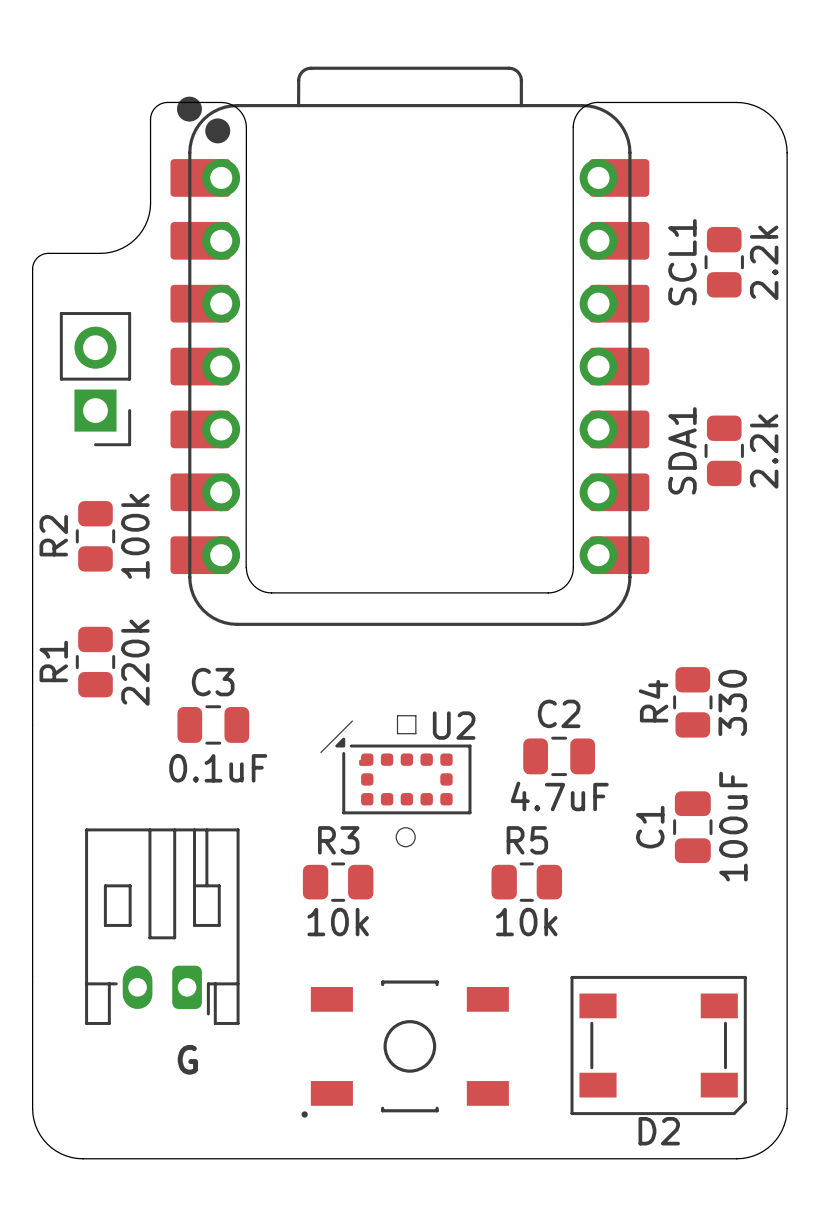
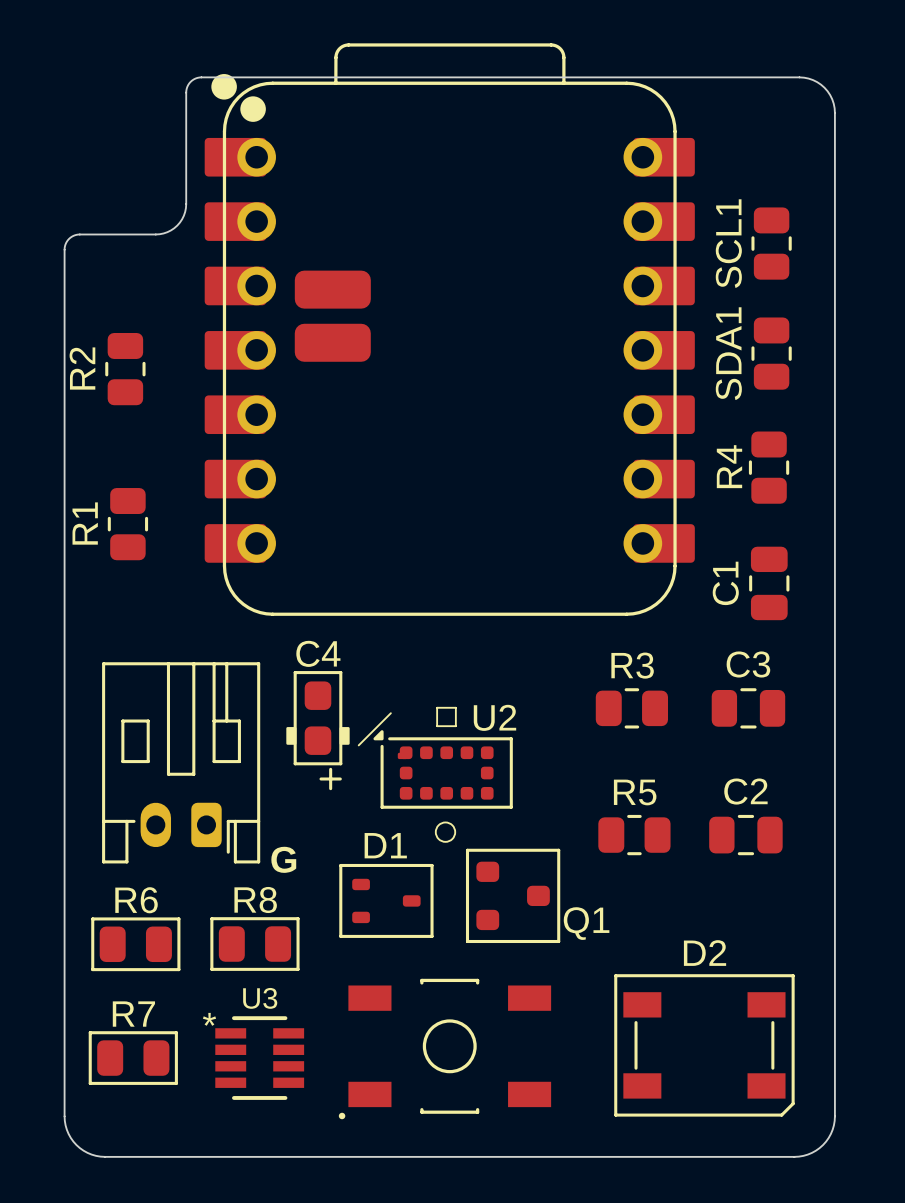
board edge: (48, 253) (37, 257) (32, 269) (32, 1108) (35, 1125) (43, 1139) (61, 1153) (82, 1158) (736, 1158) (758, 1153) (772, 1144) (784, 1125) (787, 1108) (787, 152) (782, 130) (772, 117) (758, 107) (742, 102) (598, 102) (586, 105) (575, 117) (573, 127) (573, 567) (571, 578) (564, 587) (548, 592) (271, 592) (261, 590) (253, 585) (248, 577) (246, 567) -> (79, 234) (69, 238) (64, 249) (64, 1116) (66, 1129) (73, 1141) (87, 1152) (105, 1156) (794, 1156) (807, 1154) (819, 1148) (830, 1133) (834, 1116) (834, 112) (833, 103) (827, 91) (813, 80) (799, 77) (197, 77) (189, 83) (186, 90) (186, 204) (183, 215) (177, 225) (167, 232) (159, 234) (132, 234)
board edge: (100, 253) (116, 250) (131, 242) (142, 229) (147, 219) (150, 203) (150, 117) (155, 107) (165, 102) (221, 102) (230, 104) (239, 109) (244, 118) (246, 127) (246, 567) -> none
SCL1 value: 2.2k (764, 262) -> none
part: none -> (332, 289)
part: none -> (332, 342)
part: (95, 379) -> none
R2: none -> (125, 369)
SDA1 position: (724, 450) -> (771, 353)
SDA1 value: 2.2k (764, 451) -> none
R2 name: R2 (53, 535) -> R1 (85, 523)
R2 value: 100k (135, 536) -> none
R1: 220k (95, 662) -> none
R4 position: (692, 702) -> (769, 467)
R4 value: 330 (732, 702) -> none
C3 position: (213, 724) -> (748, 708)
C4: none -> (317, 730)
C2 position: (559, 756) -> (745, 835)
C3 value: 0.1uF (218, 768) -> none
C2 value: 4.7uF (559, 796) -> none
C1 value: 100uF (733, 826) -> none
C1 position: (692, 827) -> (769, 583)
R3 position: (338, 882) -> (631, 708)
R5 position: (526, 882) -> (634, 835)
Q1: none -> (513, 895)
D1: none -> (386, 900)
R3 value: 10k (338, 922) -> none
R5 value: 10k (526, 922) -> none
part position: (162, 926) -> (181, 762)
R6: none -> (135, 944)
R8: none -> (254, 944)
R7: none -> (133, 1058)
U3: none -> (259, 1058)
text position: G (187, 1059) -> G (283, 859)
D2 name position: D2 (659, 1131) -> D2 (705, 953)

